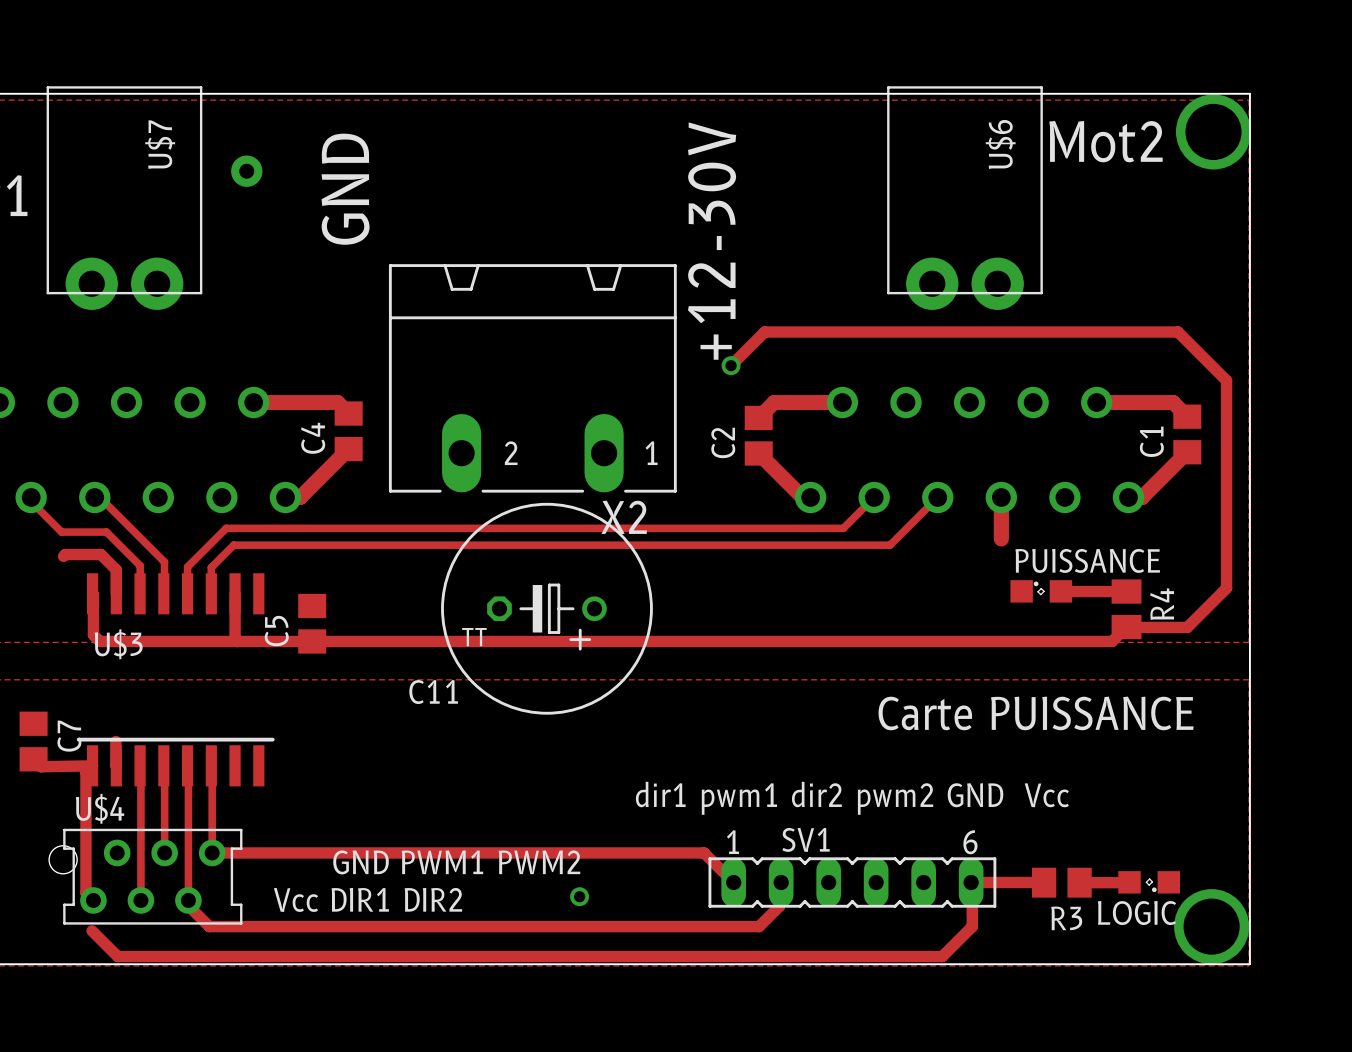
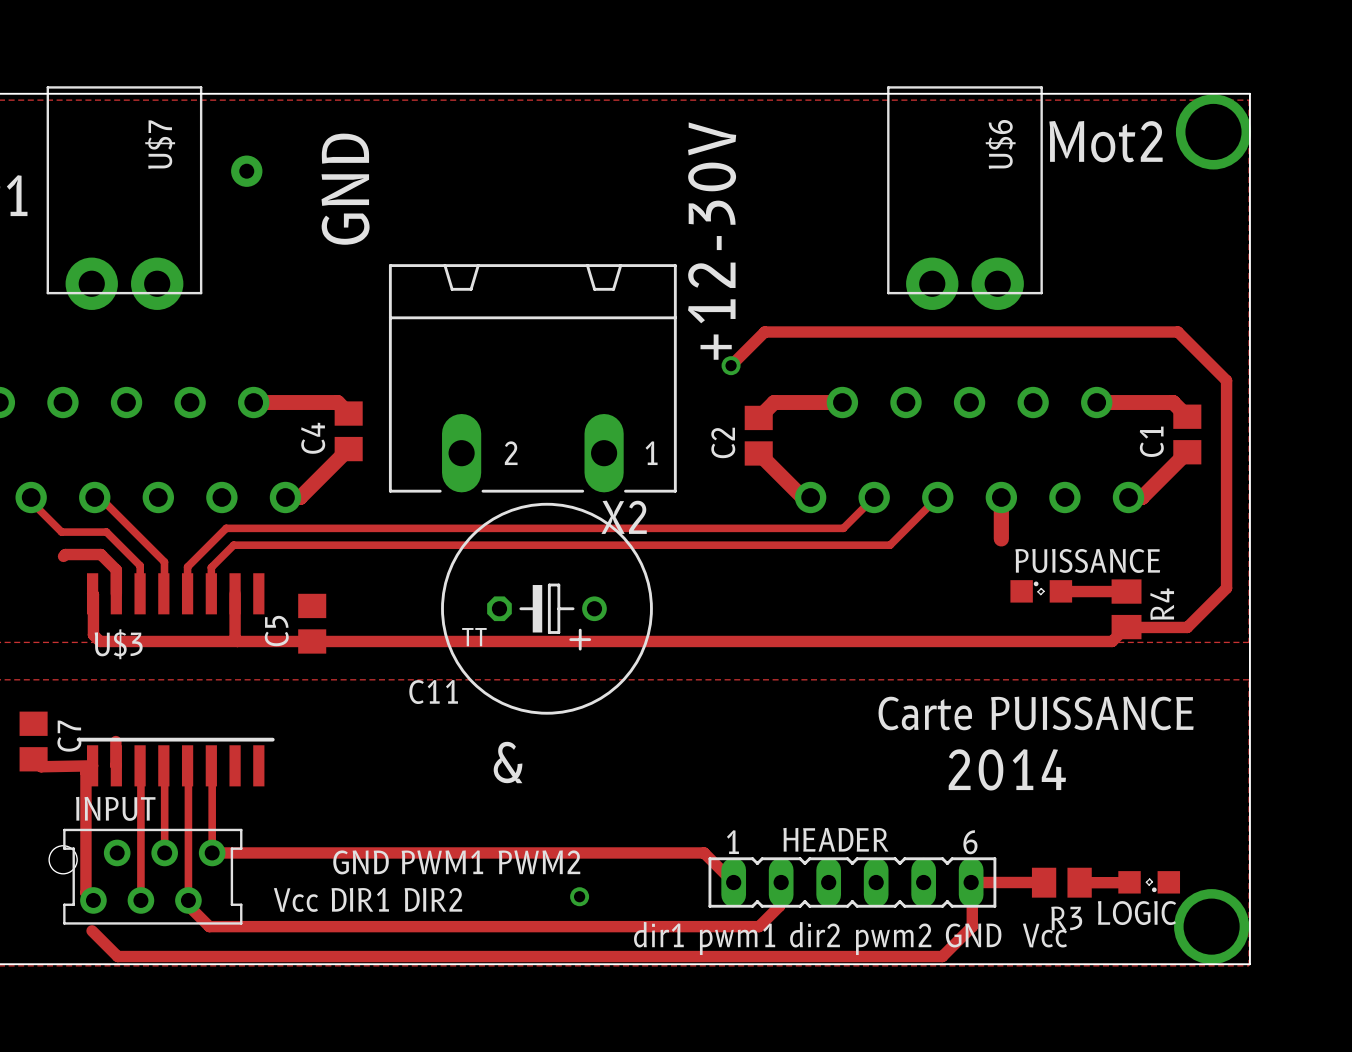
text: none -> & (508, 762)
text: none -> 2014 (1007, 769)
text position: dir1 pwm1 dir2 pwm2 GND Vcc (852, 798) -> dir1 pwm1 dir2 pwm2 GND Vcc (850, 938)
U$4 name: U$4 (100, 808) -> INPUT (115, 808)
SV1 name: SV1 (806, 839) -> HEADER (835, 839)

